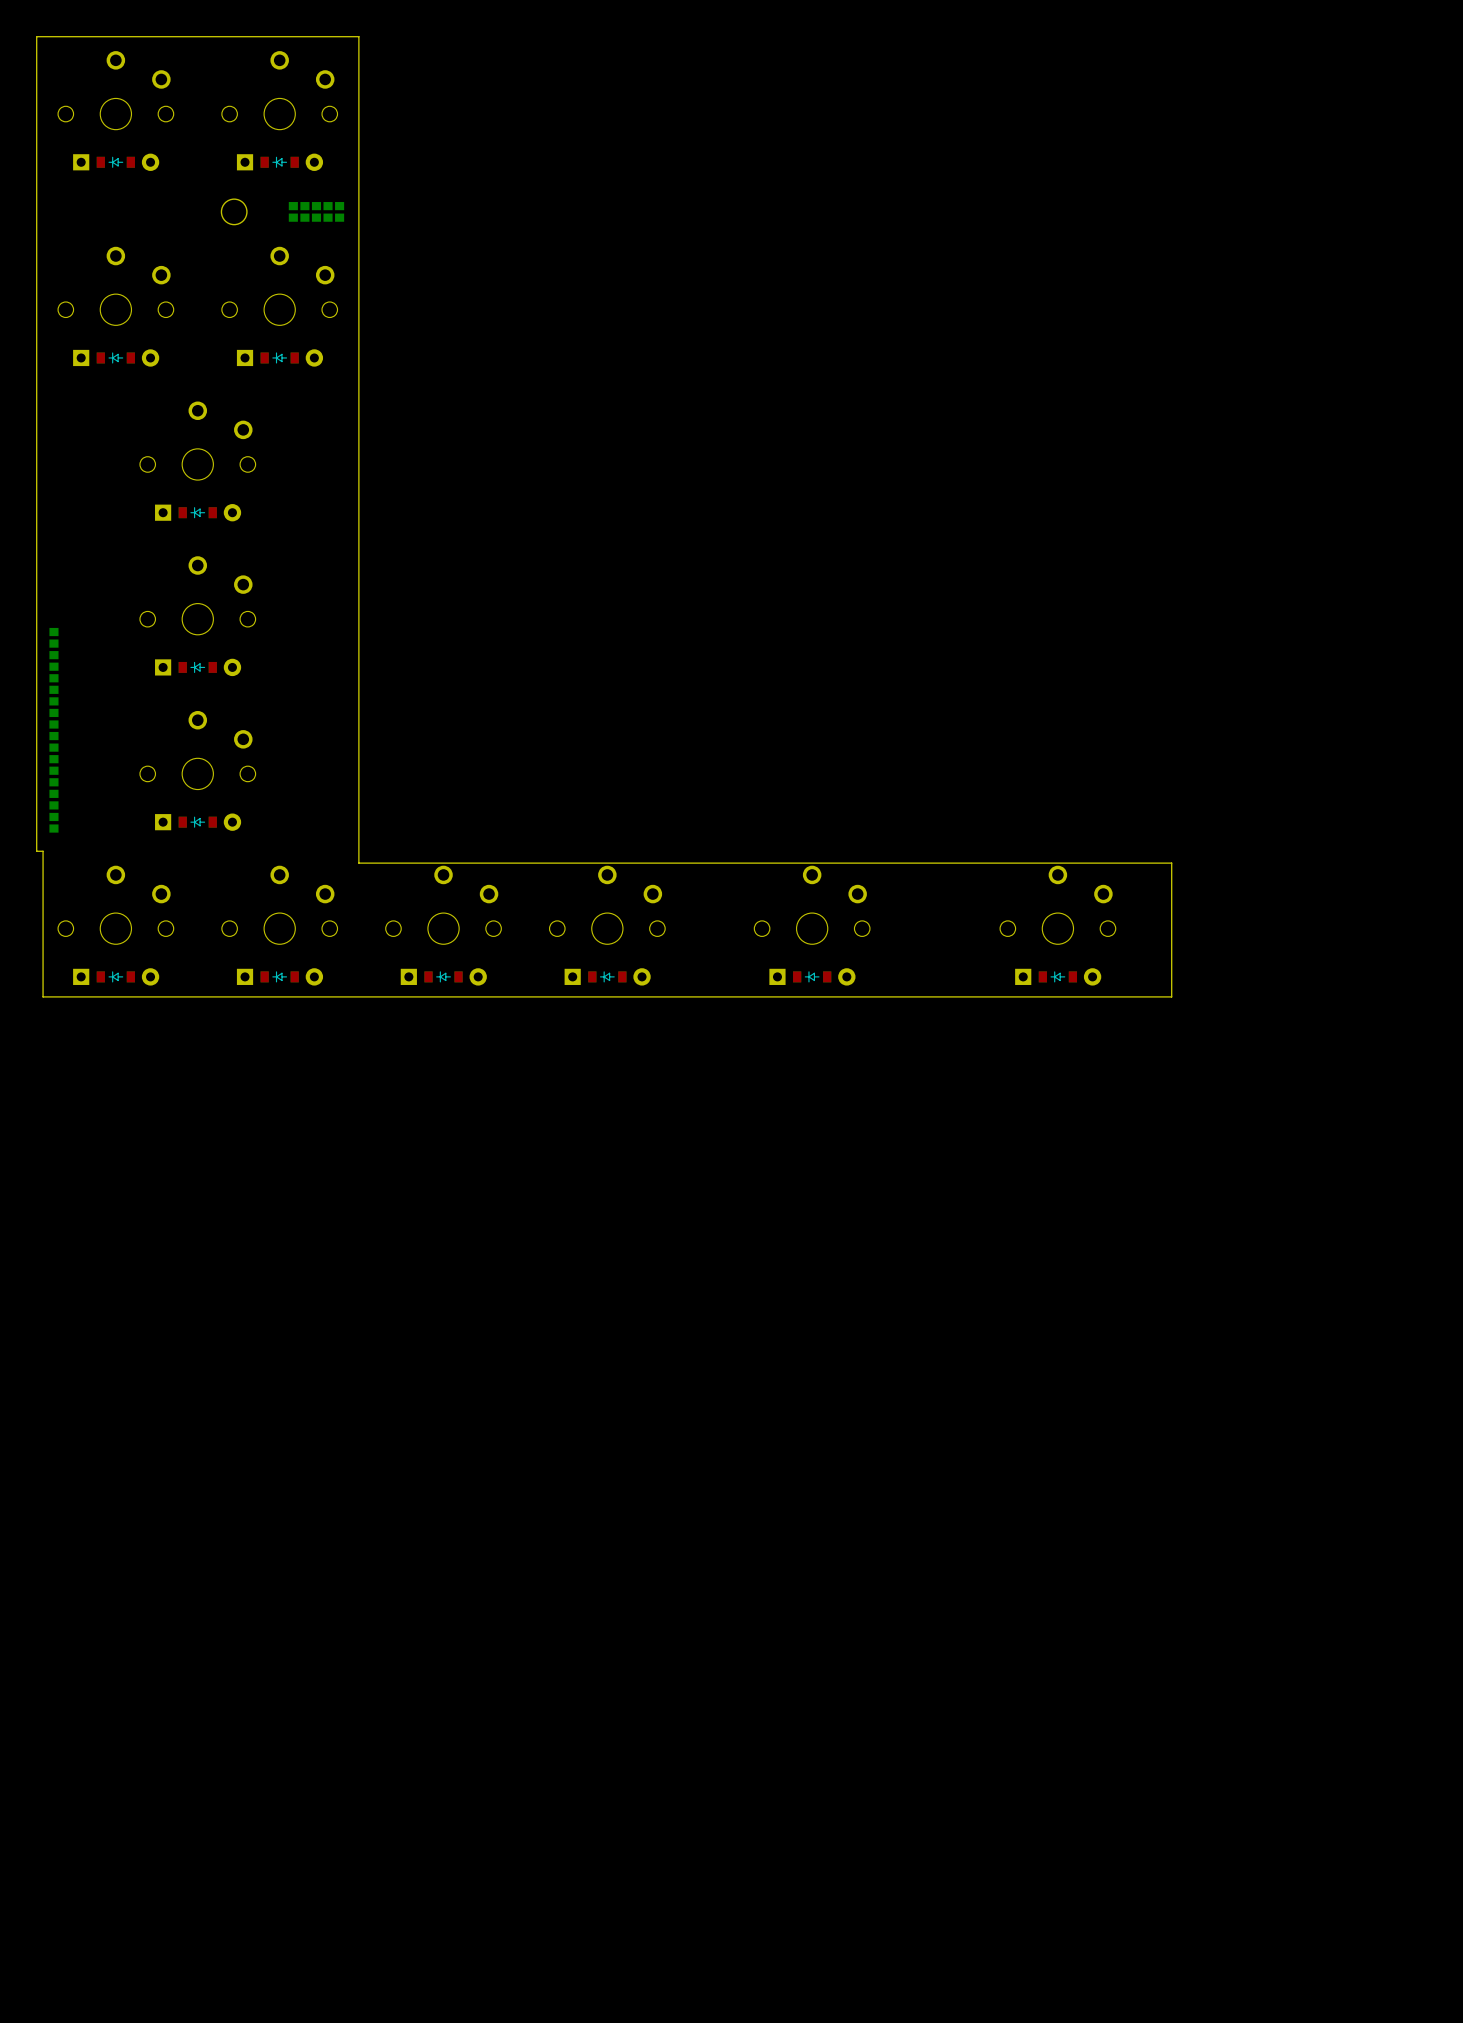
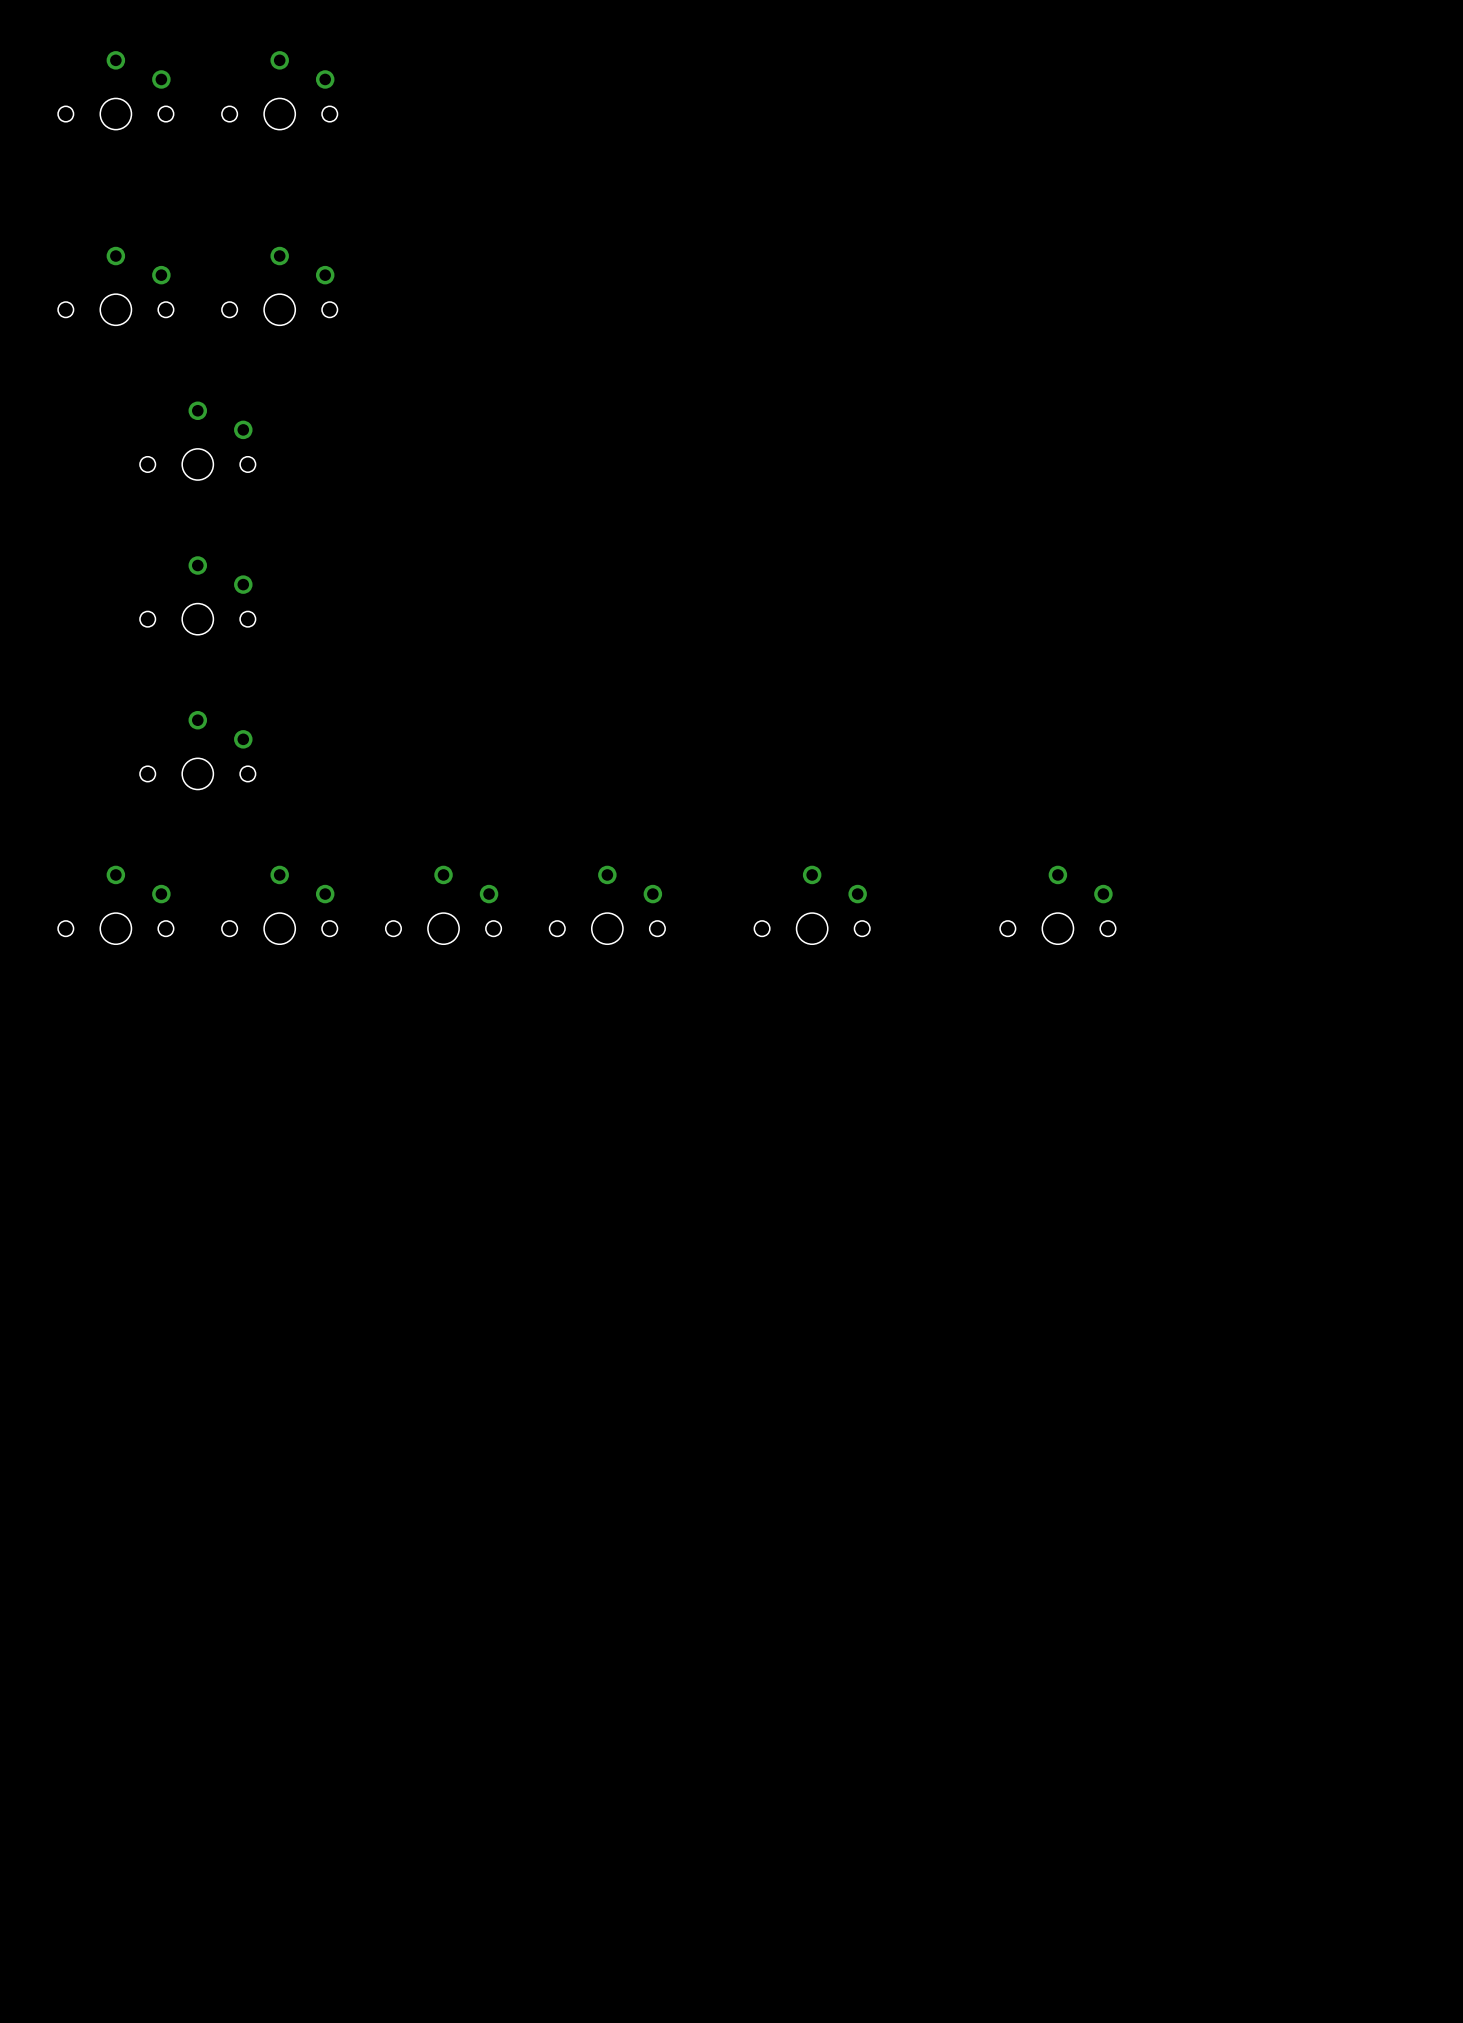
board edge: (36, 36) (358, 36) (358, 863) (1171, 863) (1171, 996) (43, 996) (43, 851) (36, 851) (36, 36) -> none
part: (116, 162) -> none
part: (279, 162) -> none
round board edge: [220, 198, 248, 226] -> none
part: (293, 206) -> none
part: (304, 206) -> none
part: (316, 206) -> none
part: (328, 206) -> none
part: (339, 206) -> none
part: (293, 217) -> none
part: (304, 217) -> none
part: (316, 217) -> none
part: (328, 217) -> none
part: (339, 217) -> none
part: (116, 357) -> none
part: (279, 357) -> none
part: (198, 512) -> none
part: (53, 632) -> none
part: (53, 643) -> none
part: (53, 655) -> none
part: (53, 666) -> none
part: (198, 667) -> none
part: (53, 678) -> none
part: (53, 689) -> none
part: (53, 701) -> none
part: (53, 712) -> none
part: (53, 724) -> none
part: (53, 736) -> none
part: (53, 747) -> none
part: (53, 759) -> none
part: (53, 770) -> none
part: (53, 782) -> none
part: (53, 793) -> none
part: (53, 805) -> none
part: (53, 816) -> none
part: (198, 822) -> none
part: (53, 828) -> none
part: (116, 976) -> none
part: (279, 976) -> none
part: (443, 976) -> none
part: (607, 976) -> none
part: (812, 976) -> none
part: (1058, 976) -> none

